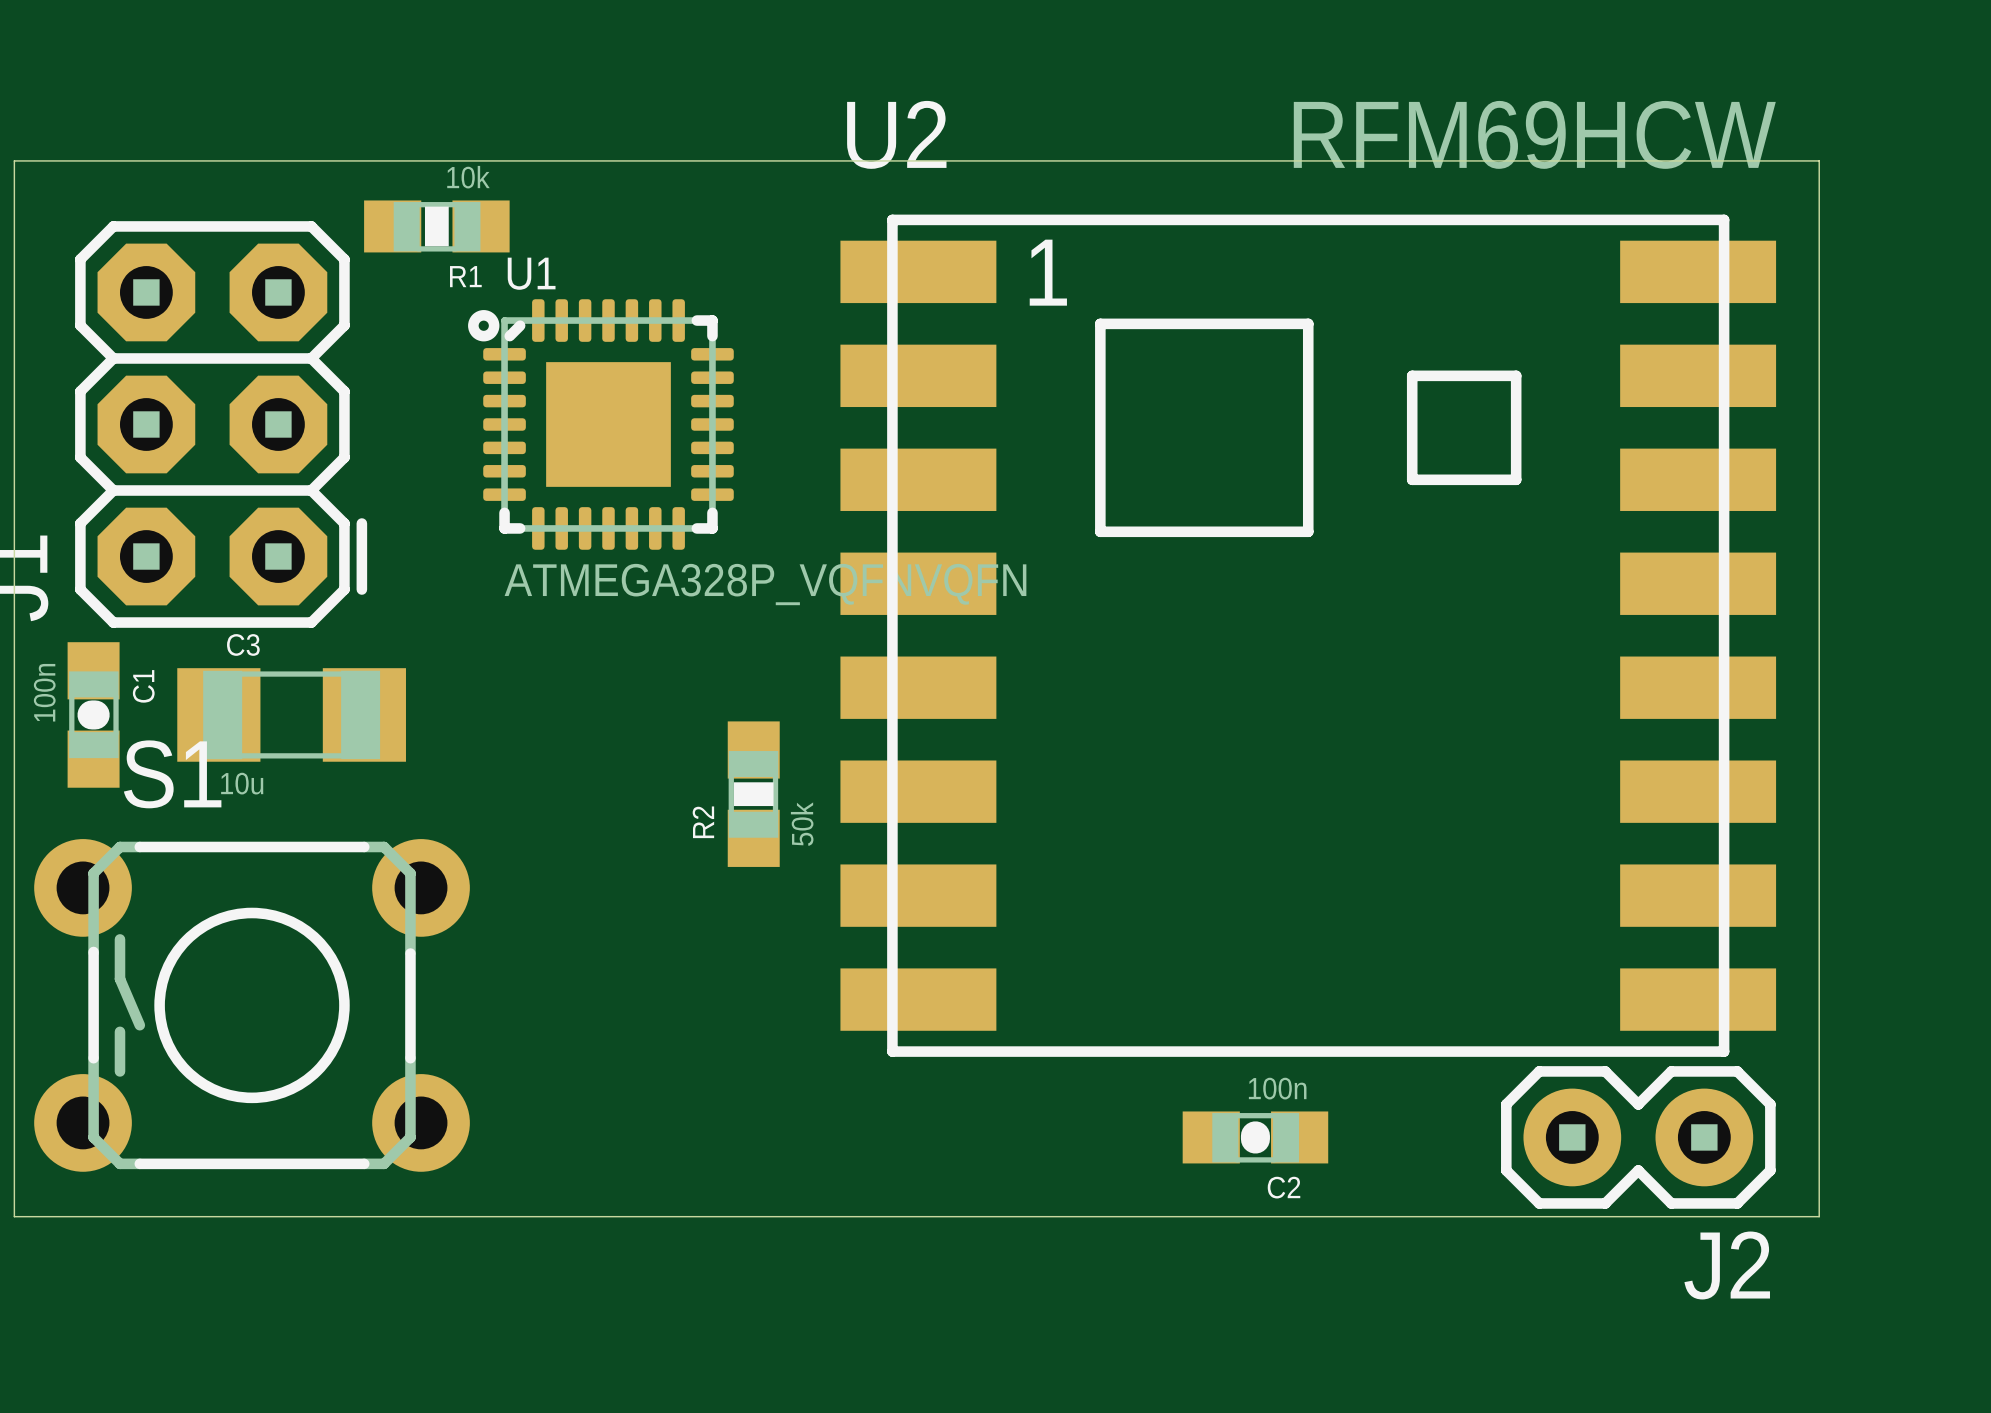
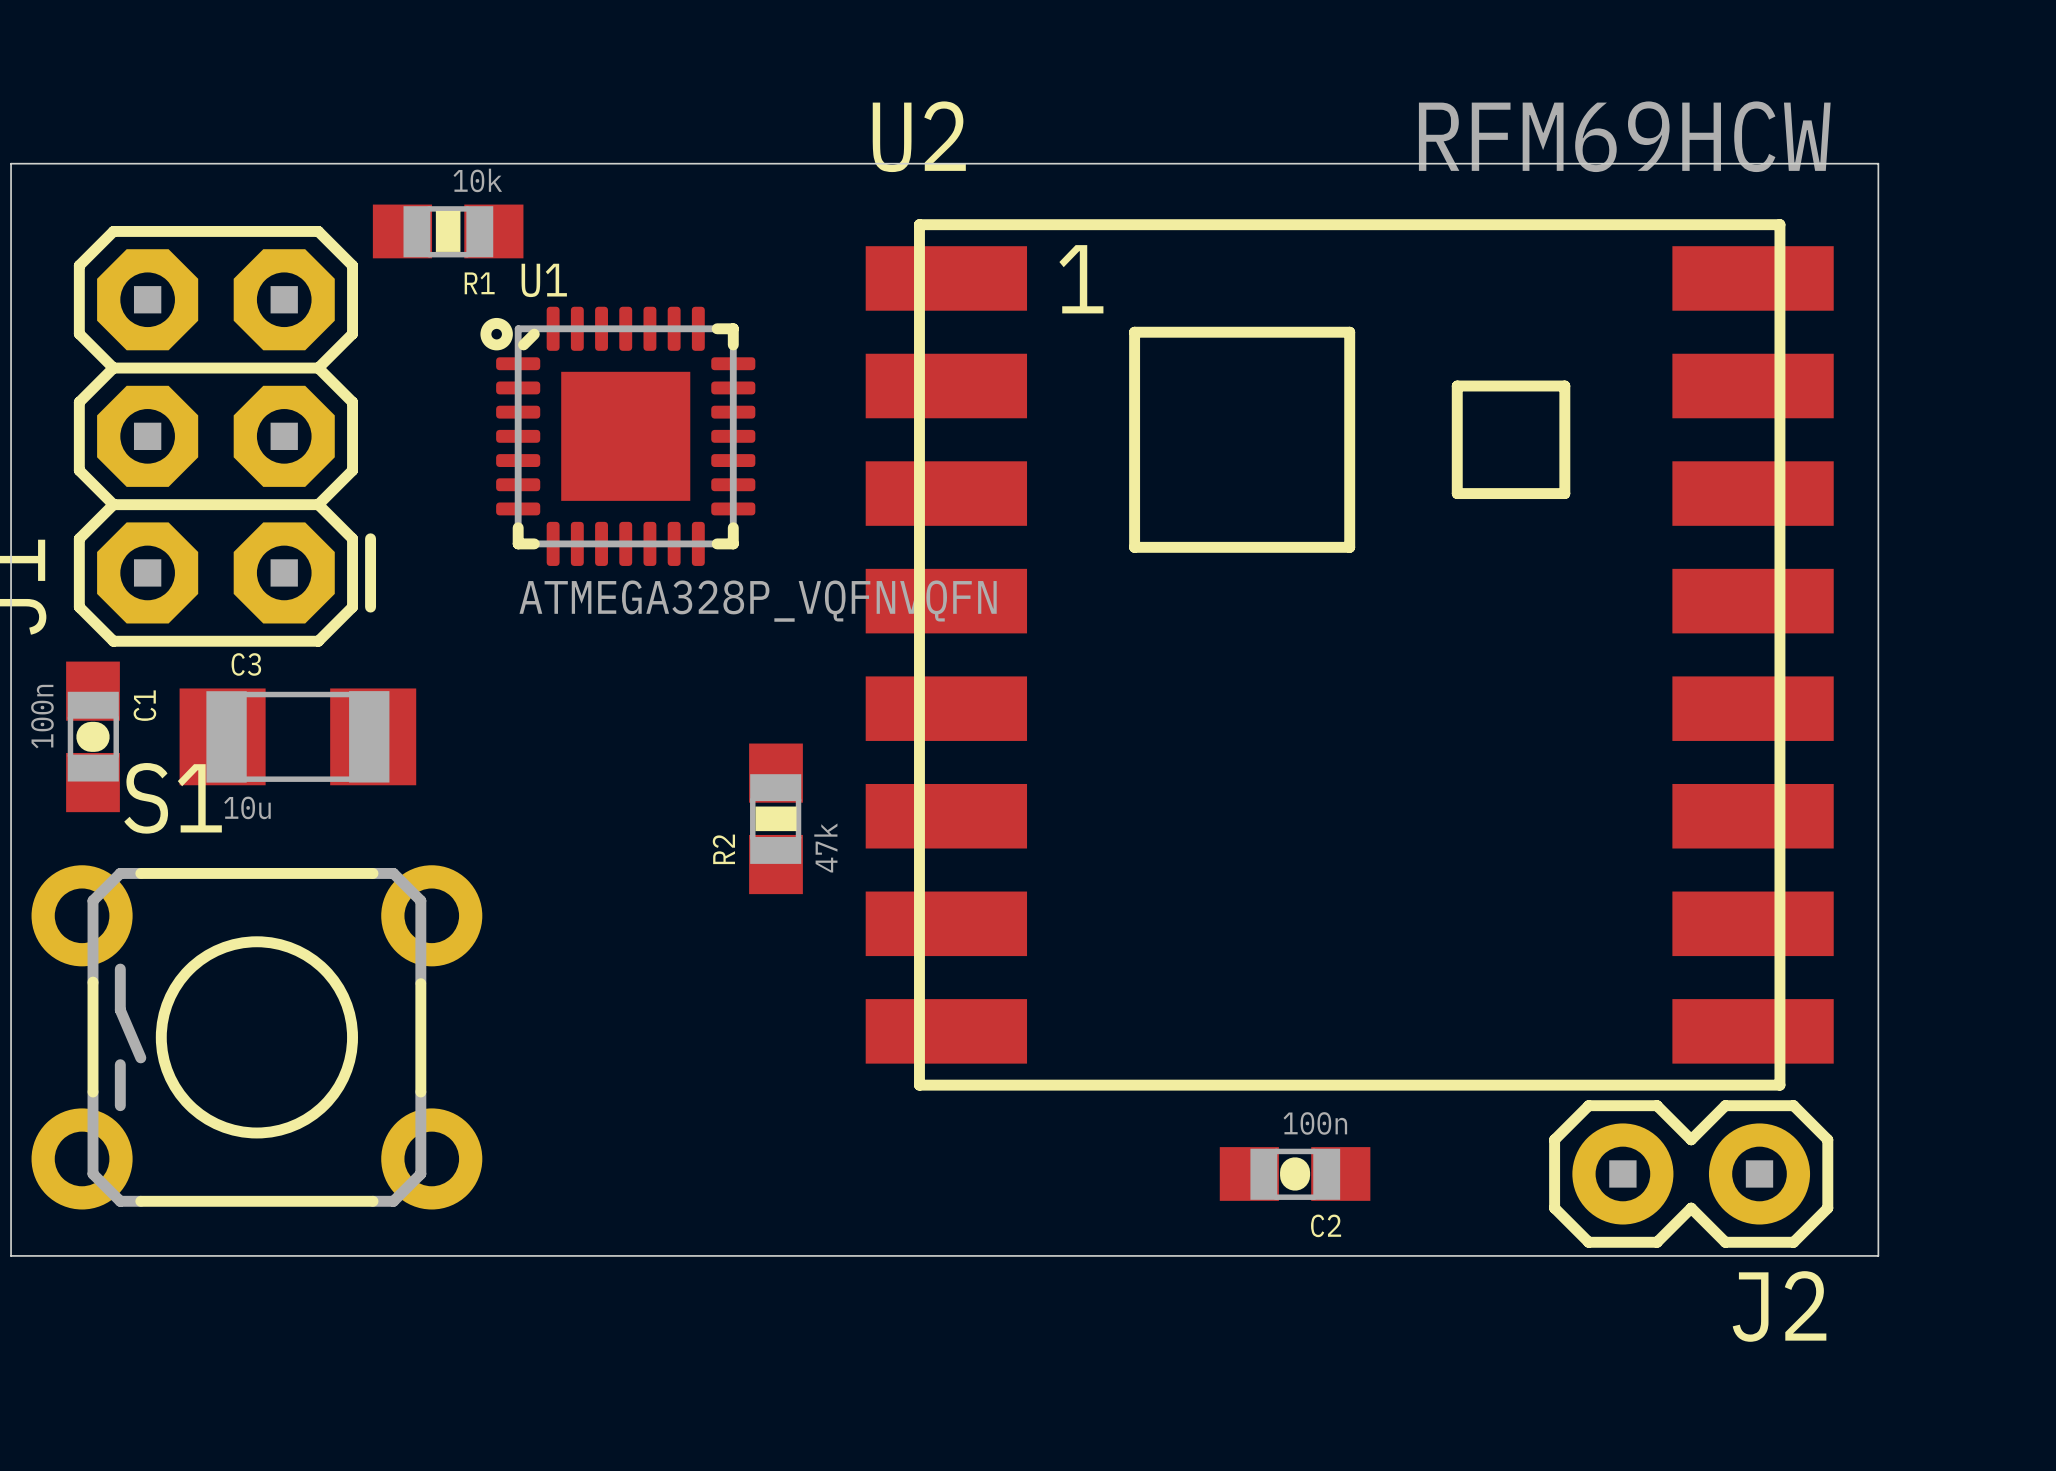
R2 value: 50k (802, 824) -> 47k (825, 847)

